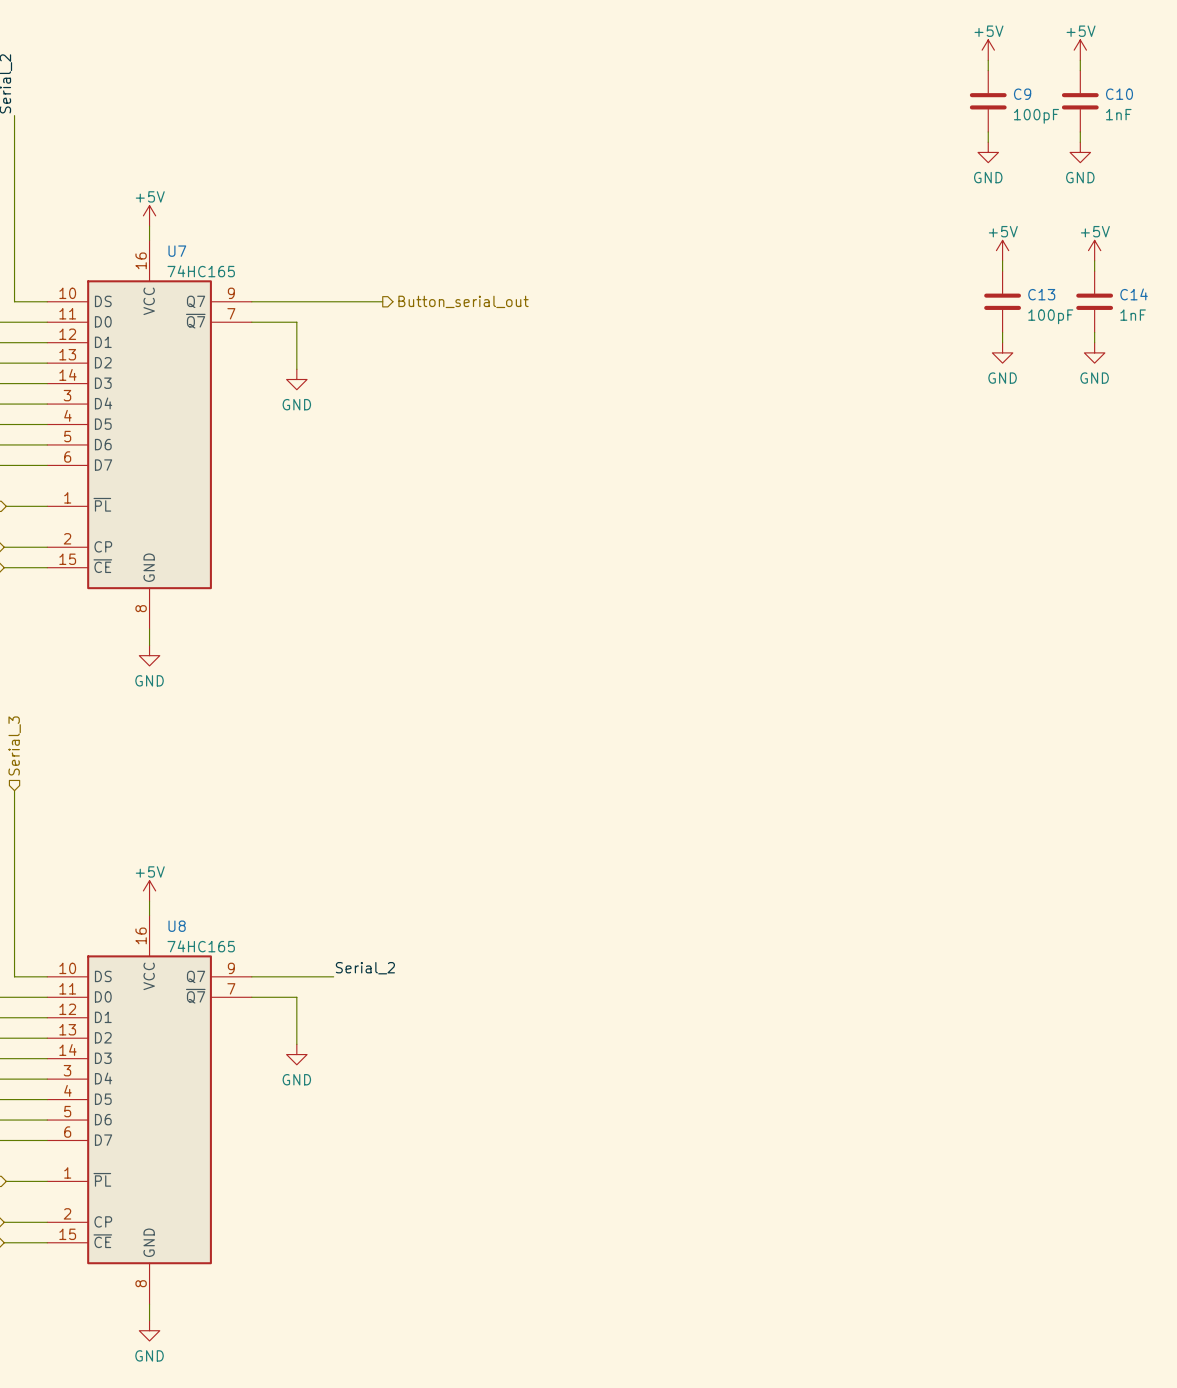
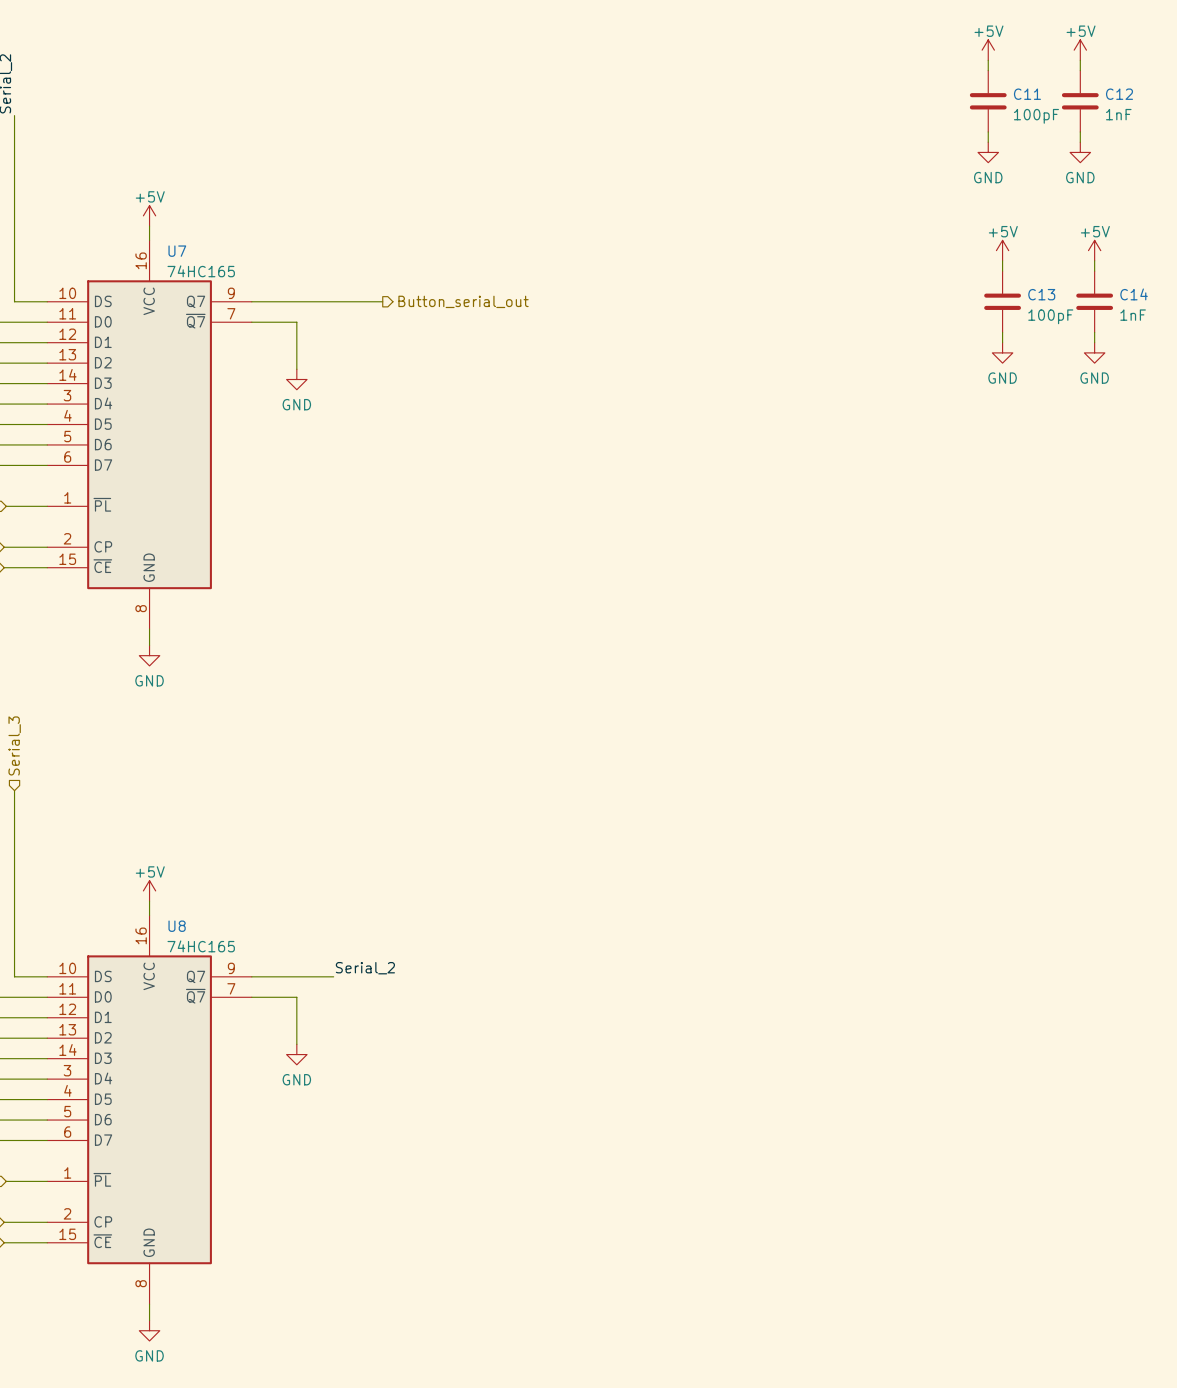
C9 name: C9 (1022, 94) -> C11 (1027, 94)
C10 name: C10 (1119, 94) -> C12 (1119, 94)

